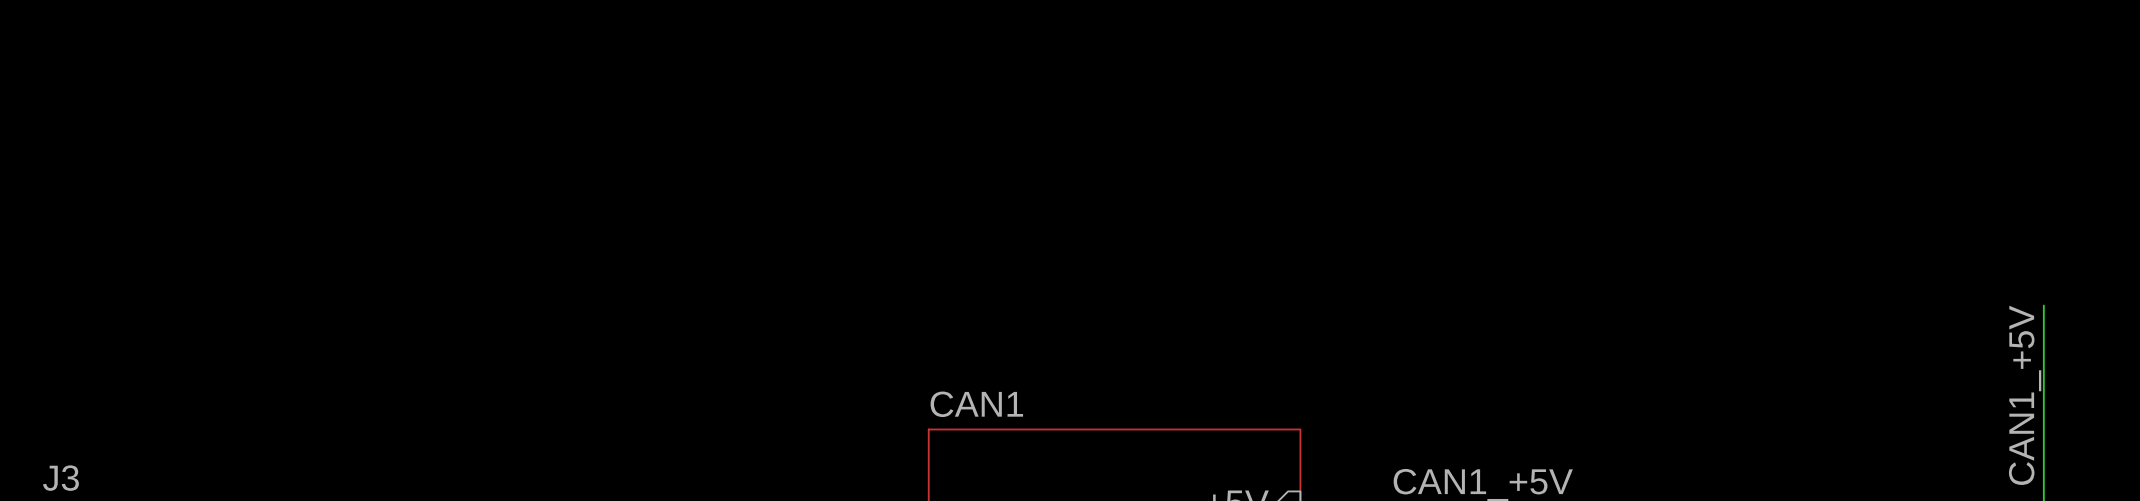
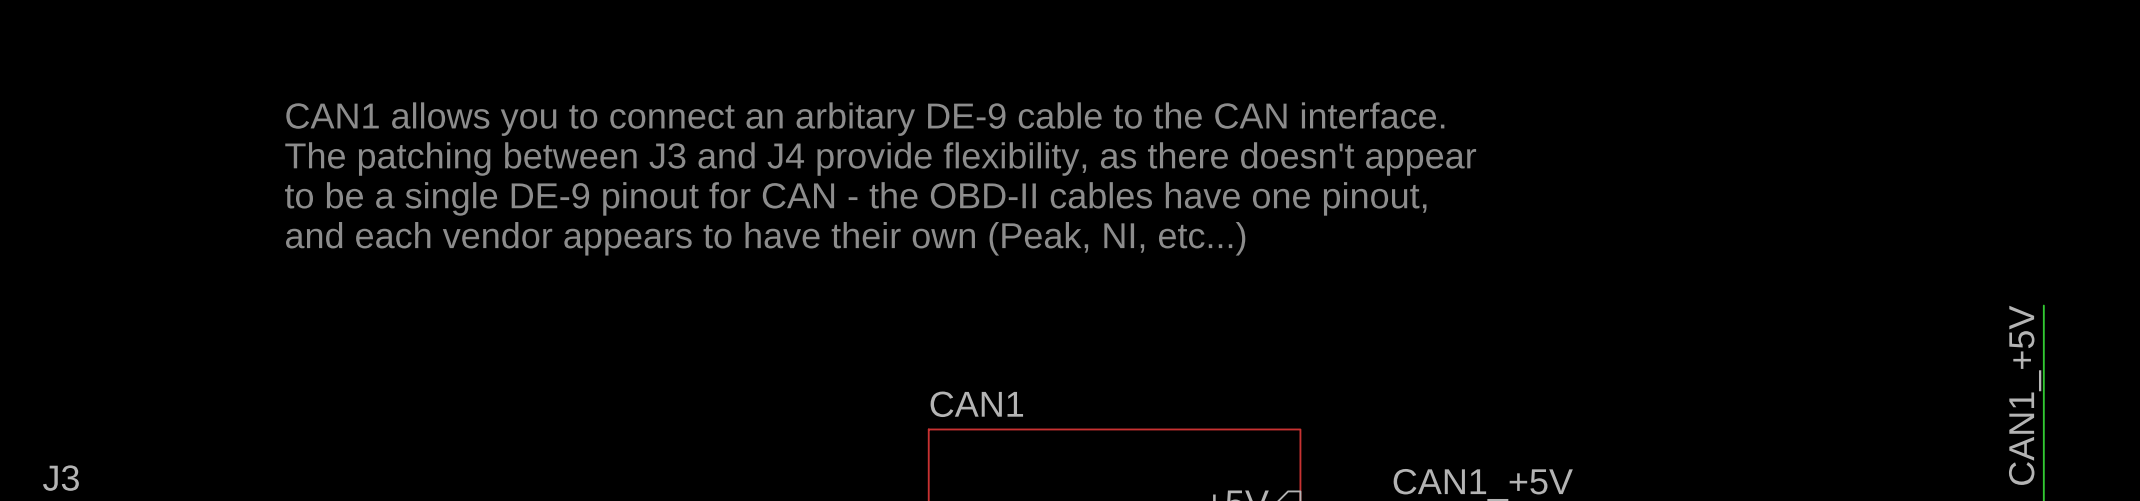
text: none -> CAN1 allows you to connect an arbitary DE-9 cable to the CAN interface. (865, 119)
text: none -> The patching between J3 and J4 provide flexibility, as there doesn't appear (880, 159)
text: none -> to be a single DE-9 pinout for CAN - the OBD-II cables have one pinout, (855, 198)
text: none -> and each vendor appears to have their own (Peak, NI, etc...) (765, 238)

